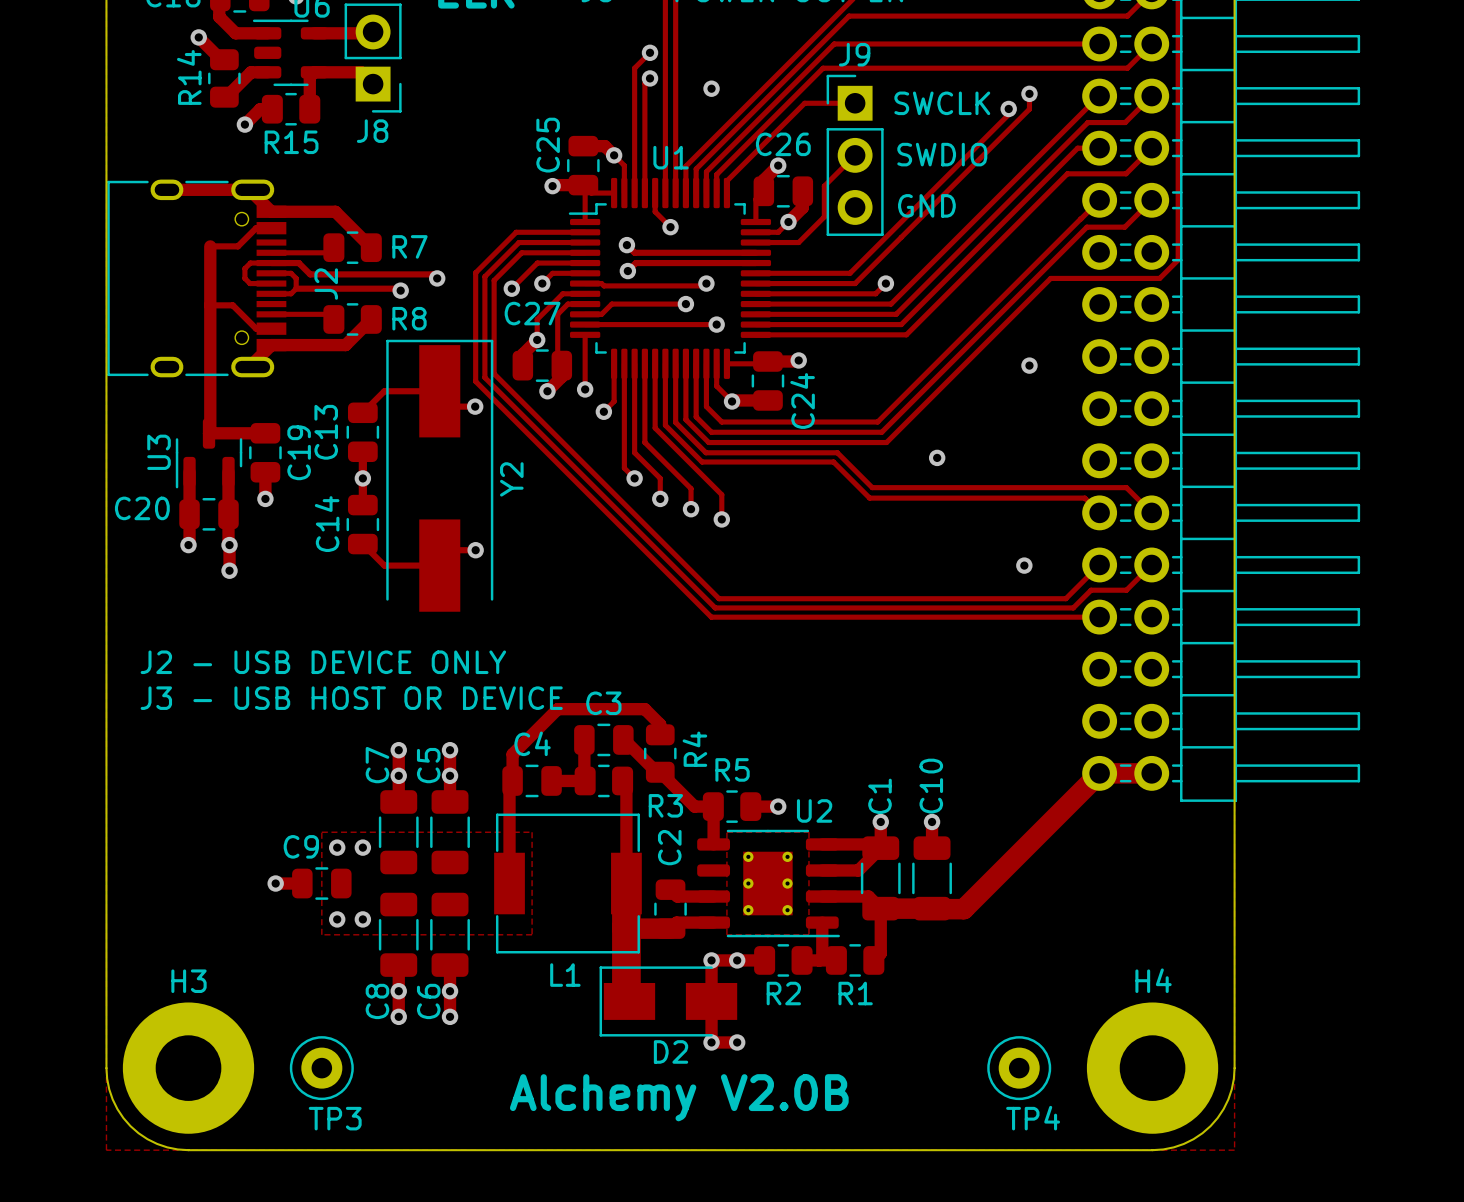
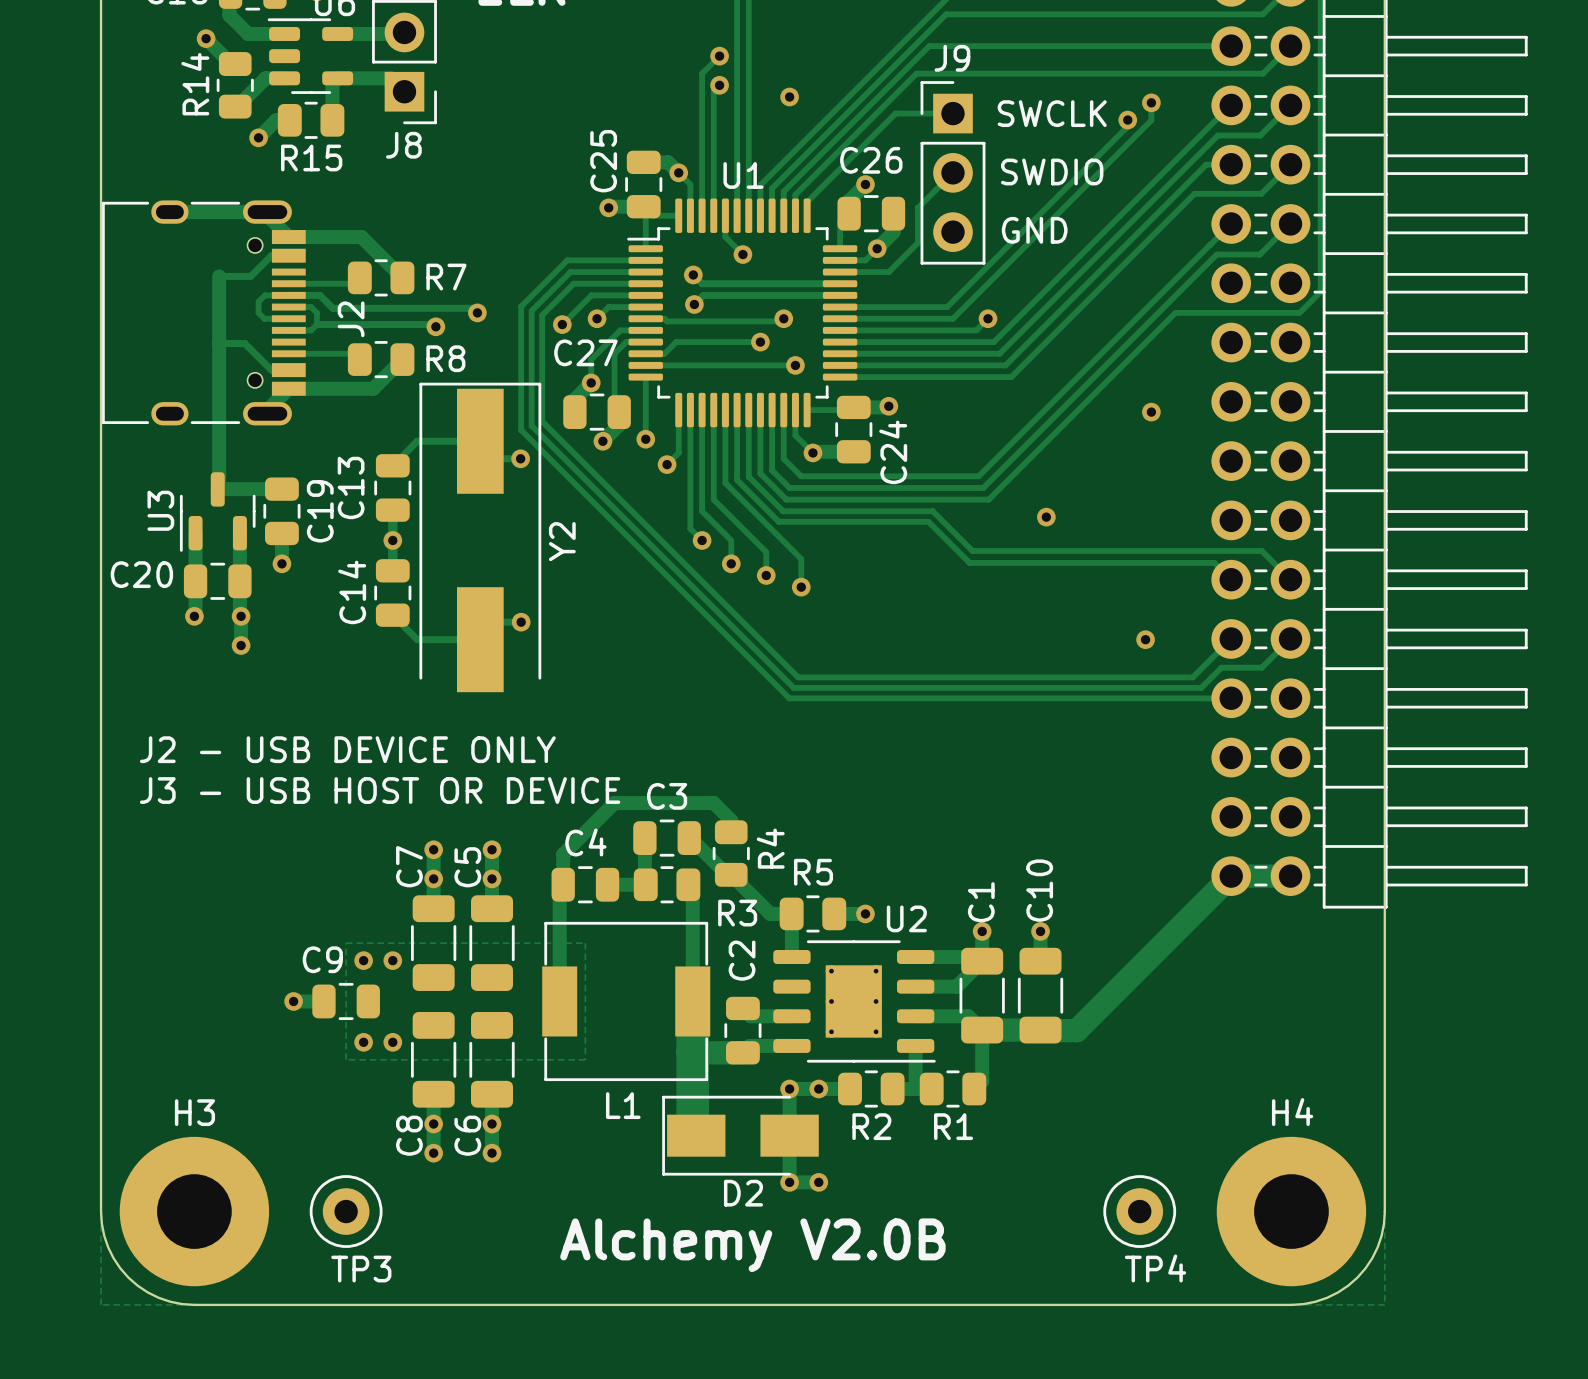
zone outline: (726, 832) (726, 934) (808, 934) (808, 832) (726, 832) -> none

